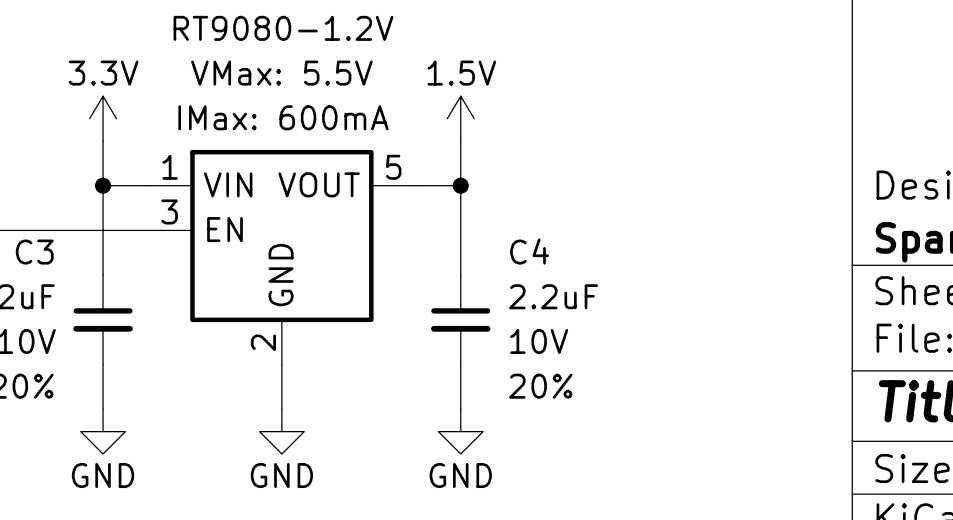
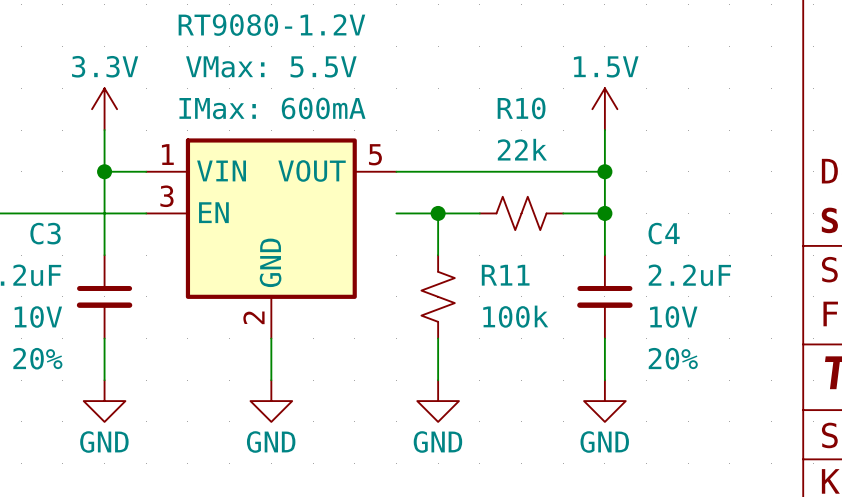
power symbol position: 1.5V (460, 118) -> 1.5V (604, 109)
wire: (460, 140) (460, 230) -> none
wire: none -> (604, 130) (604, 255)
wire: none -> (438, 171) (604, 171)
junction position: (460, 185) -> (438, 213)
junction: none -> (604, 171)
wire: none -> (396, 213) (479, 213)
R10: none -> 22k (521, 213)
wire: none -> (563, 213) (604, 213)
junction: none -> (604, 213)
C4 position: (460, 319) -> (604, 296)
R11: none -> 100k (438, 296)
wire: none -> (604, 338) (604, 380)
power symbol: none -> GND (604, 401)

